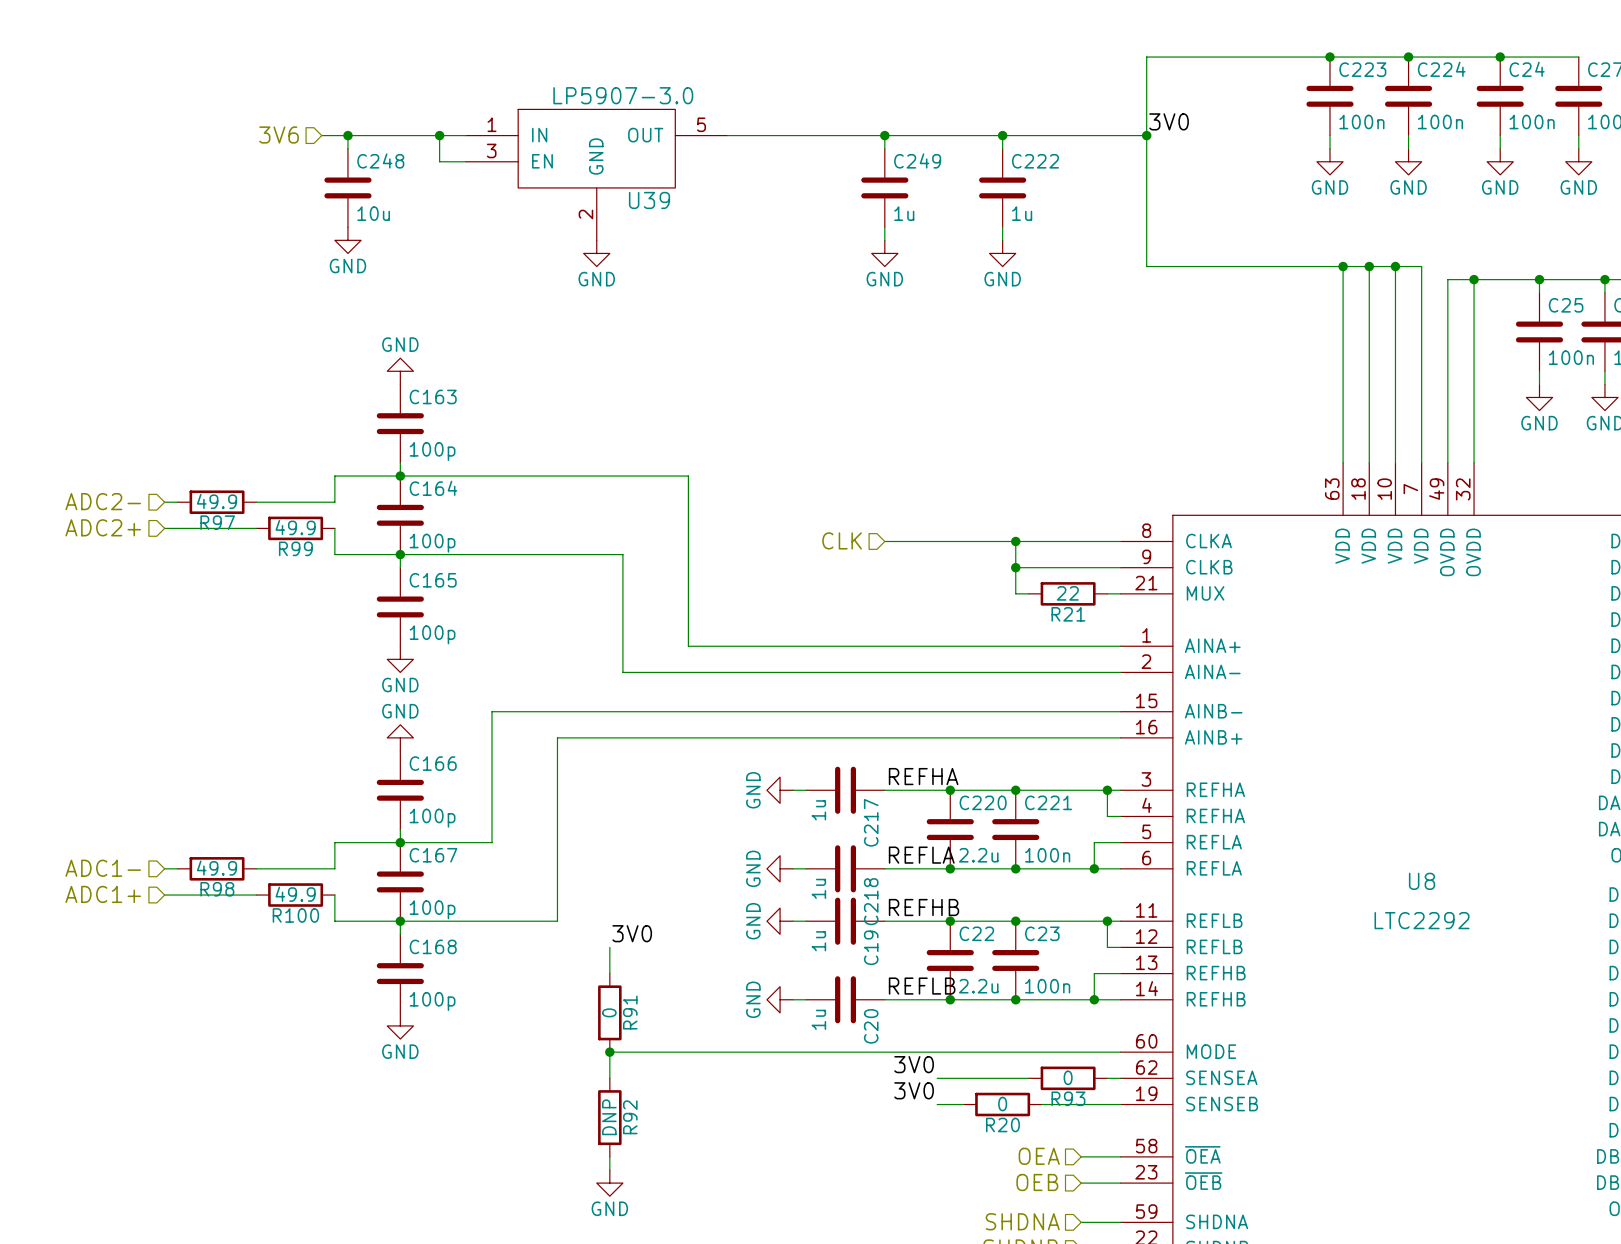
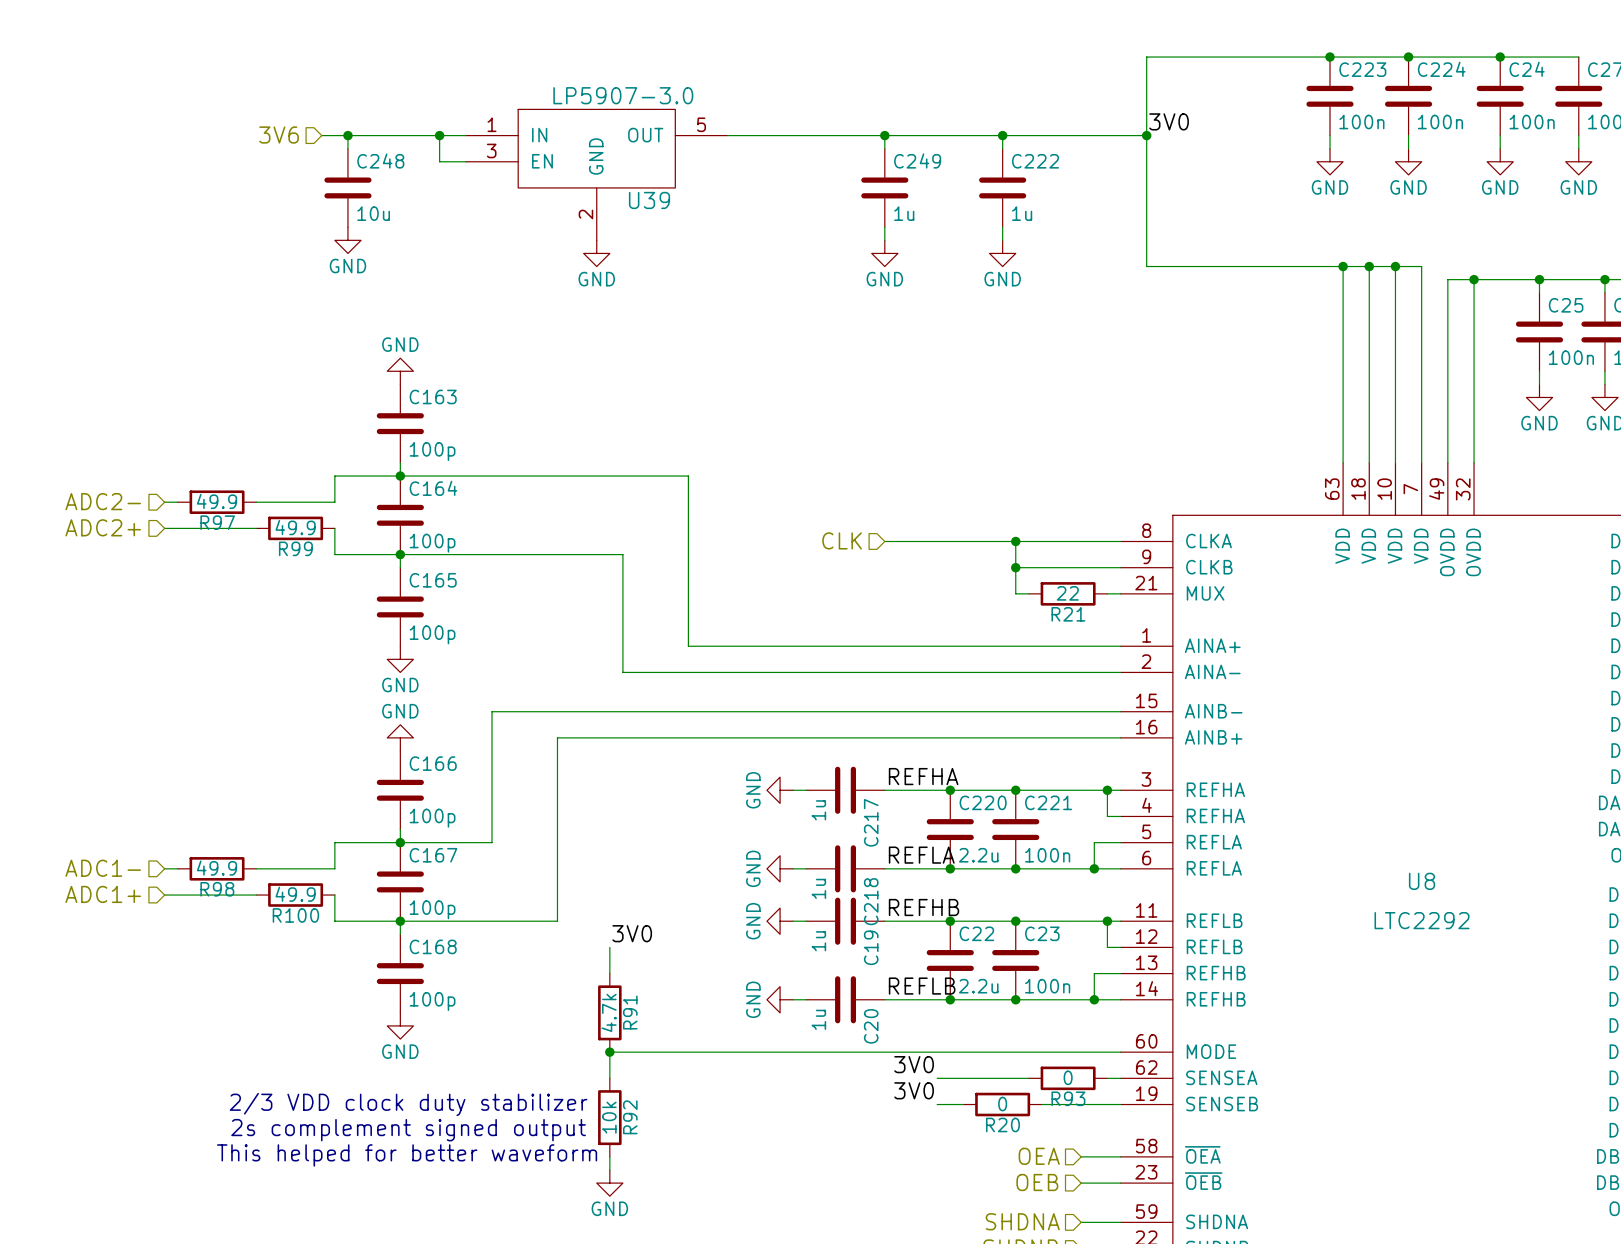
R91 value: 0 (609, 1012) -> 4.7k (609, 1012)
text: none -> 2/3 VDD clock duty stabilizer (408, 1104)
R92 value: DNP (609, 1117) -> 10k (609, 1117)
text: none -> 2s complement signed output (408, 1130)
text: none -> This helped for better waveform (407, 1155)

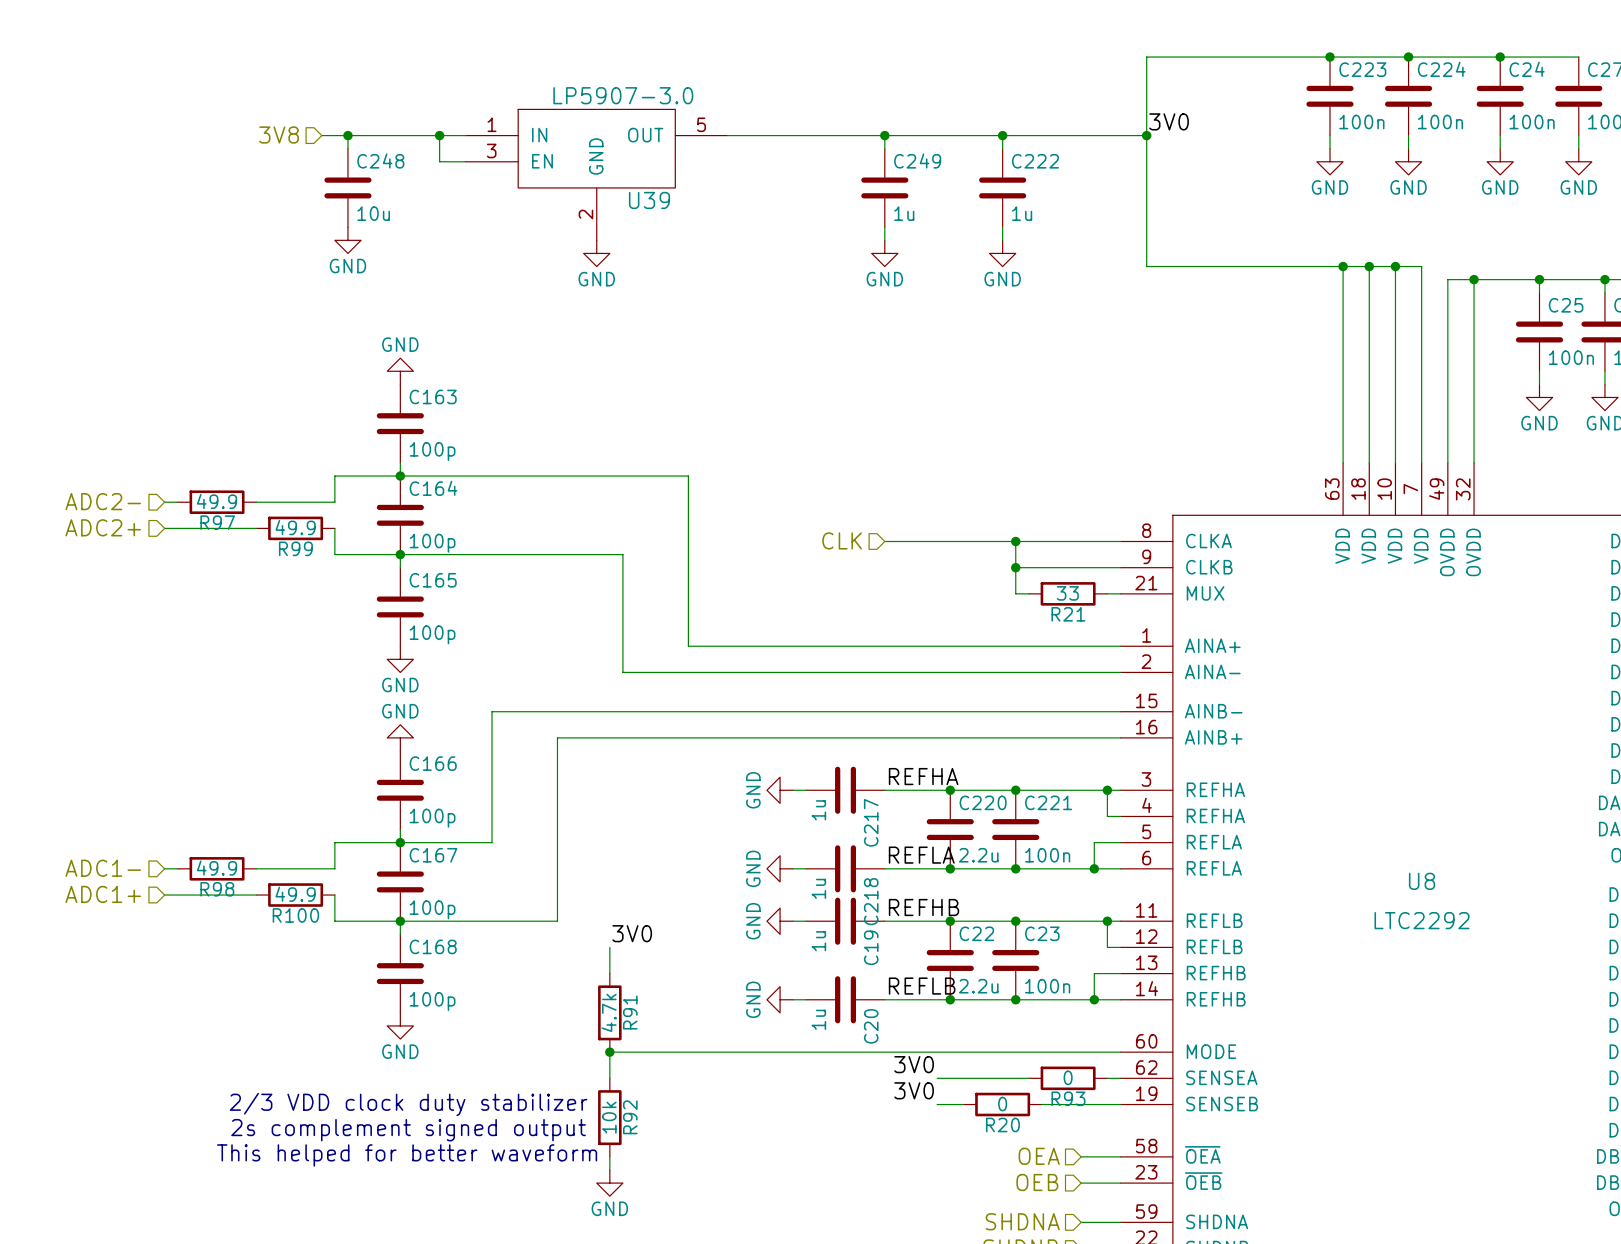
hierarchical label: 3V6 (279, 135) -> 3V8 (279, 135)
R21 value: 22 (1067, 593) -> 33 (1067, 593)

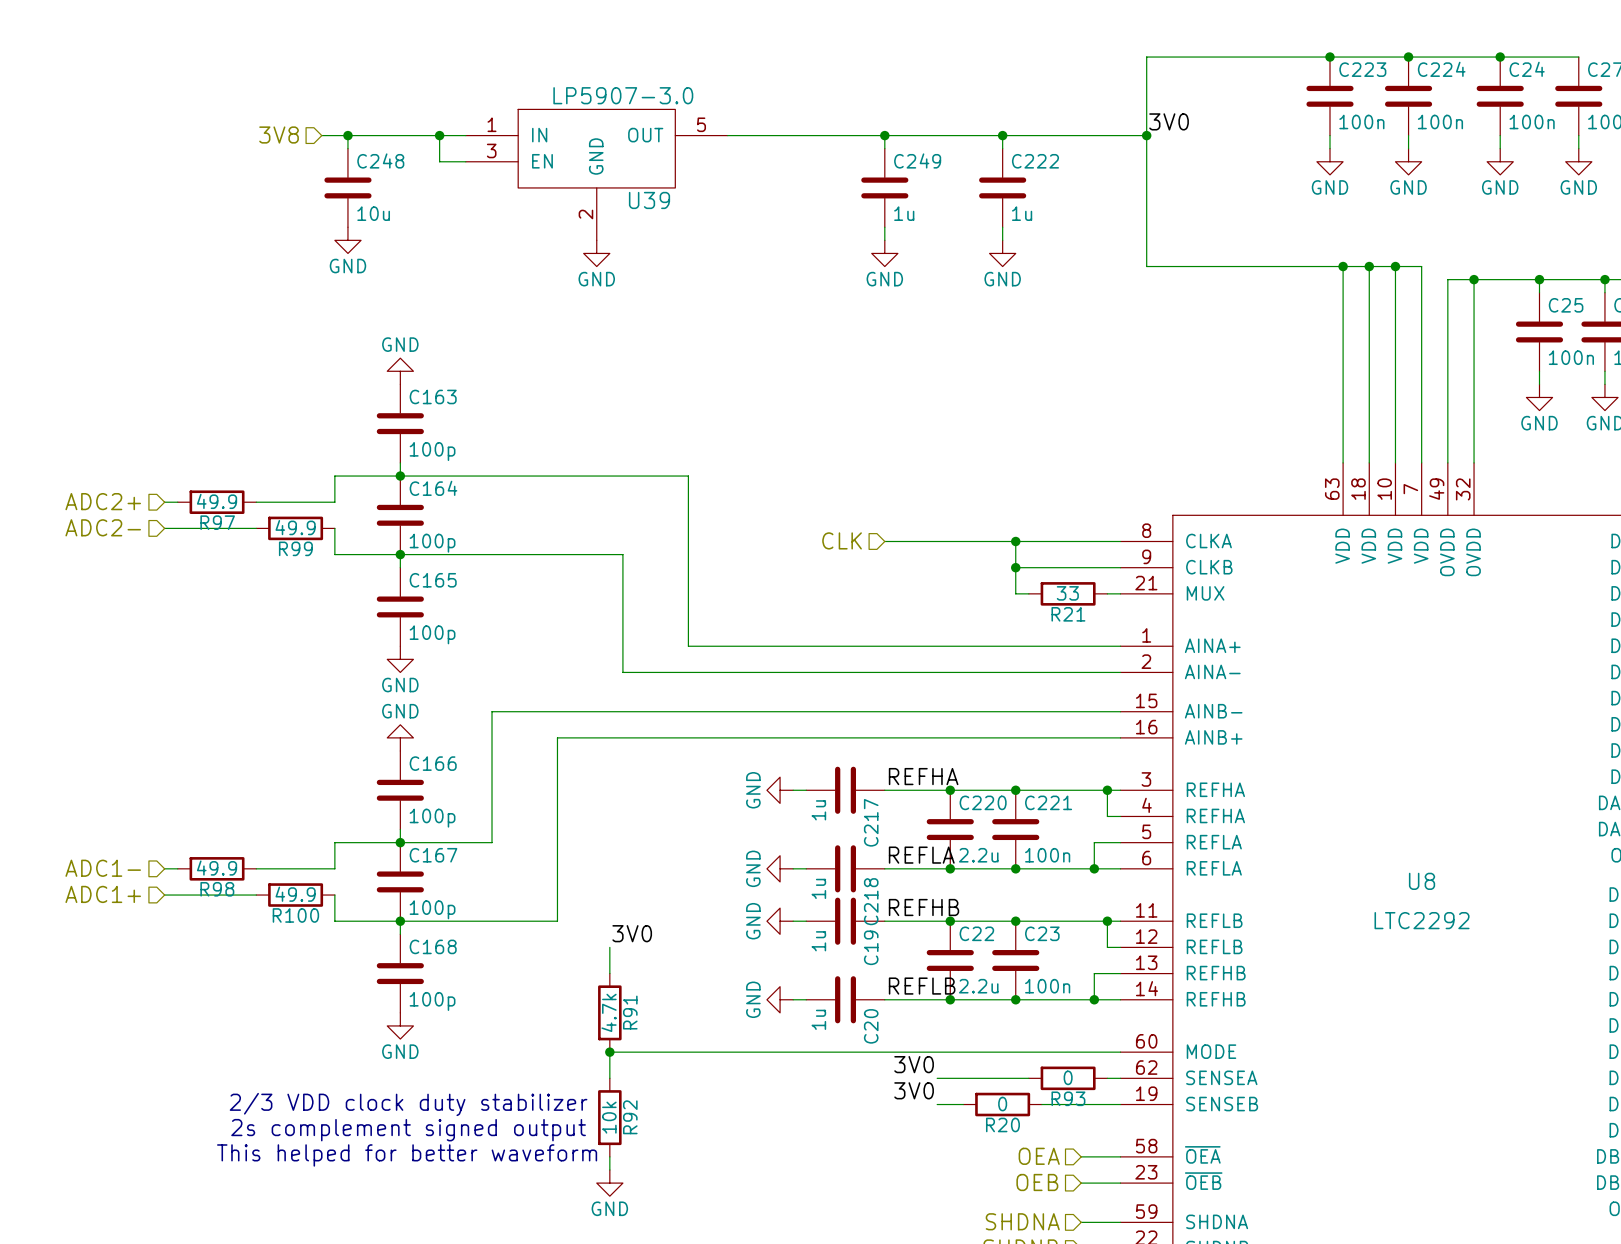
hierarchical label: ADC2- (103, 501) -> ADC2+ (103, 501)
hierarchical label: ADC2+ (103, 527) -> ADC2- (103, 527)

